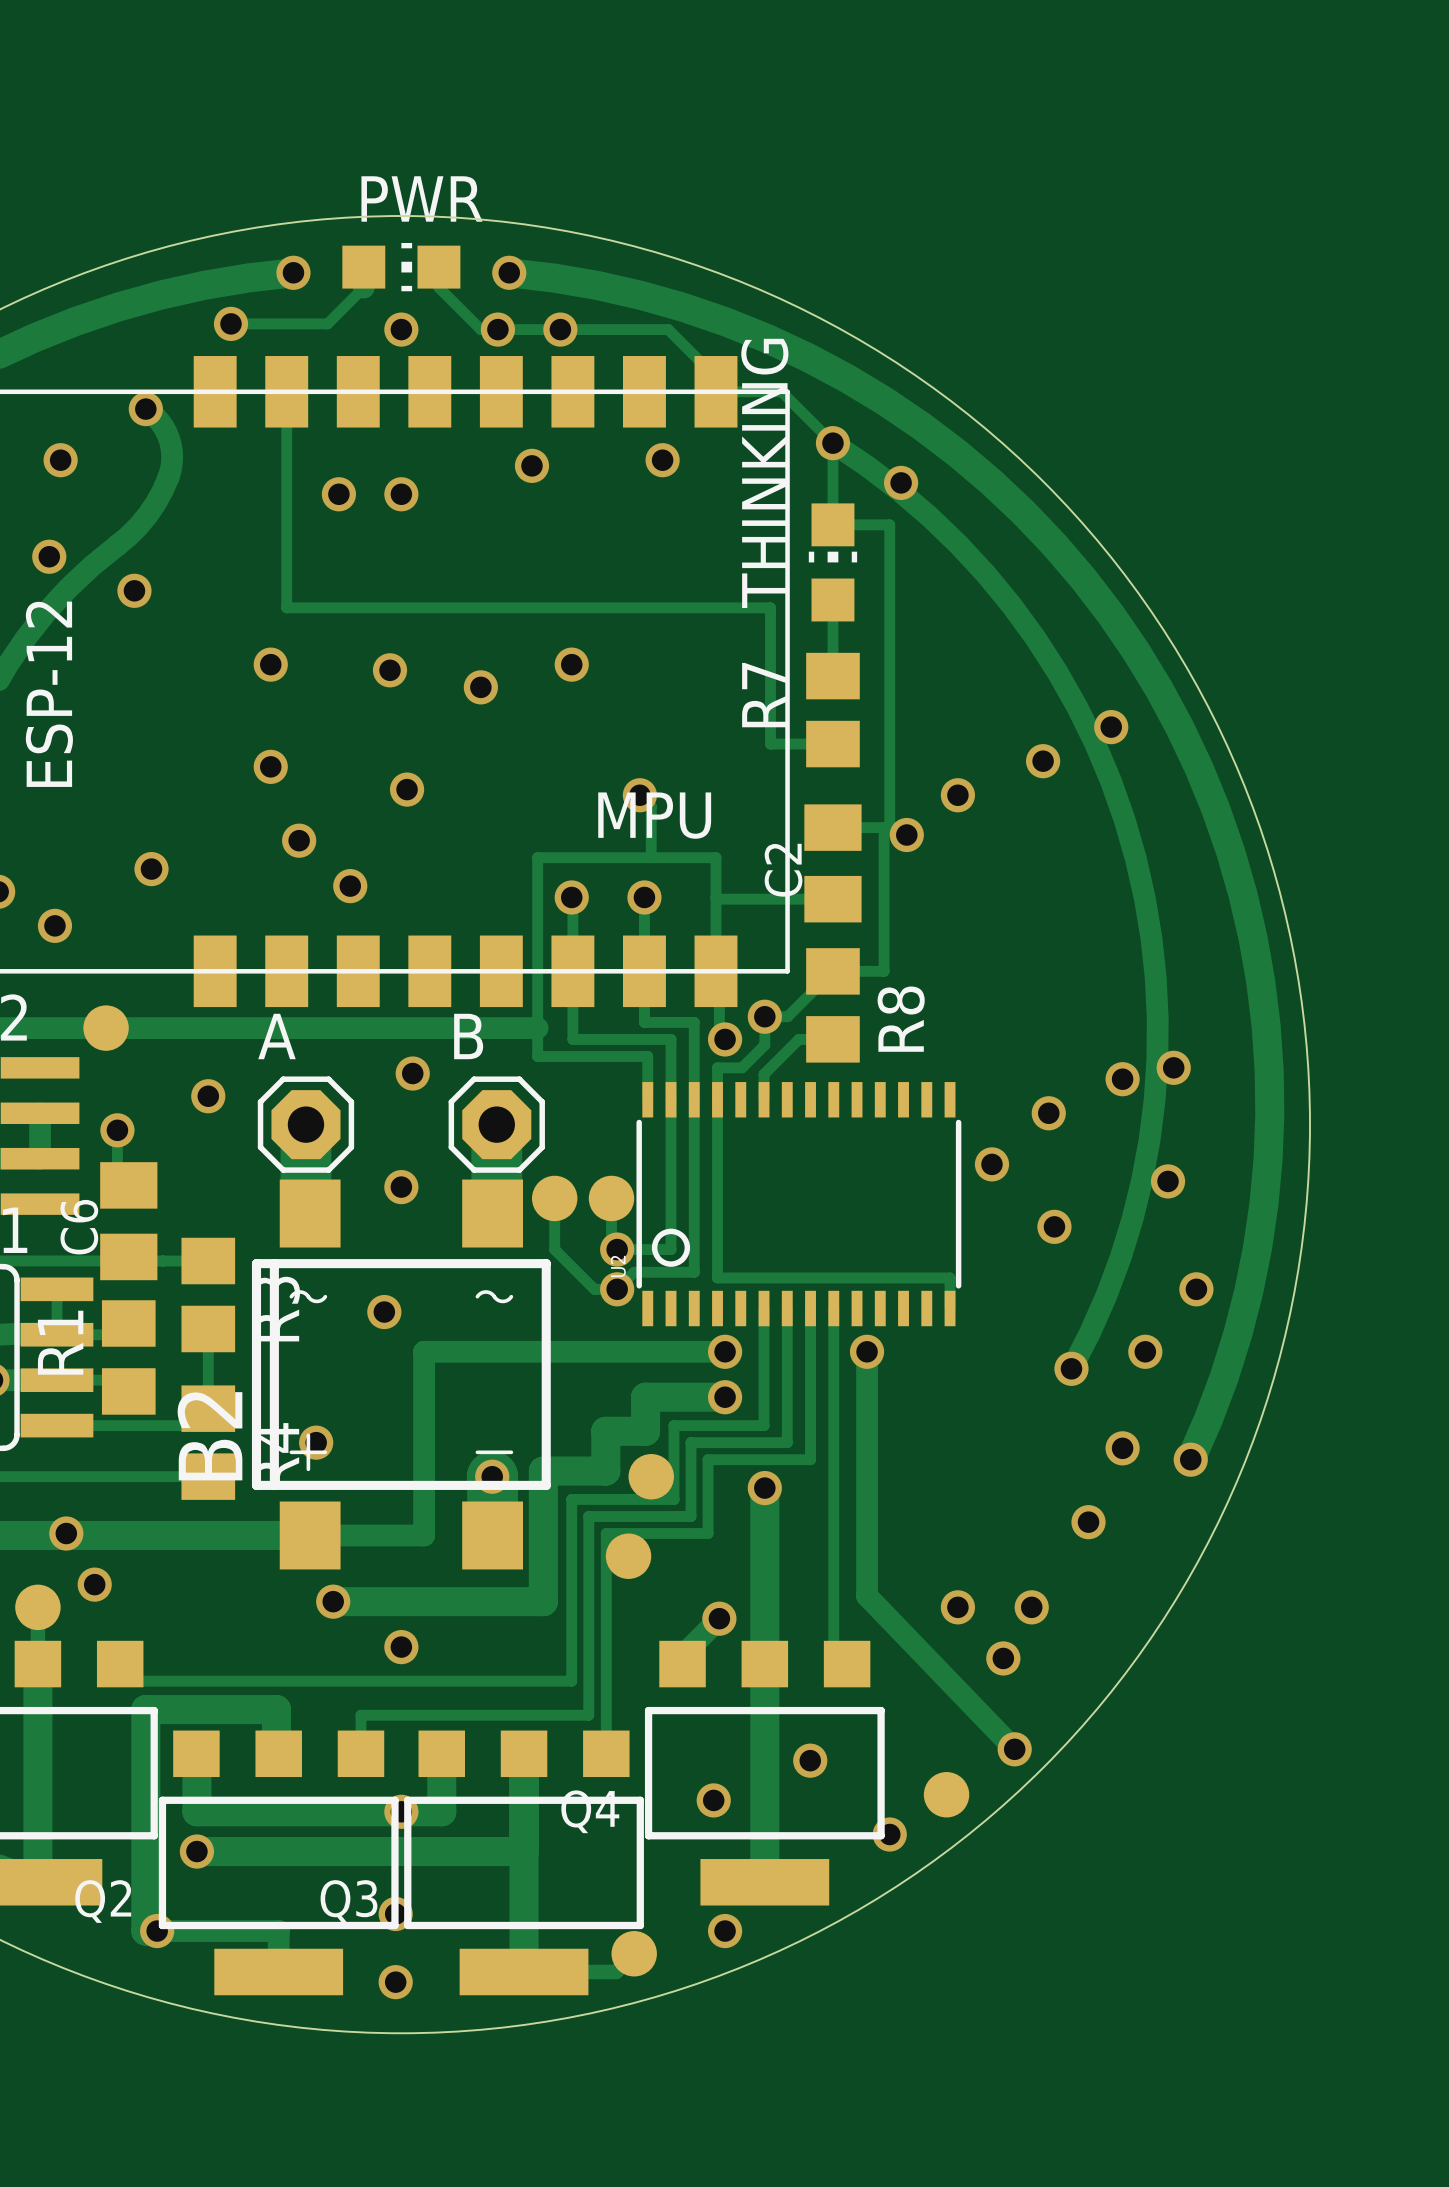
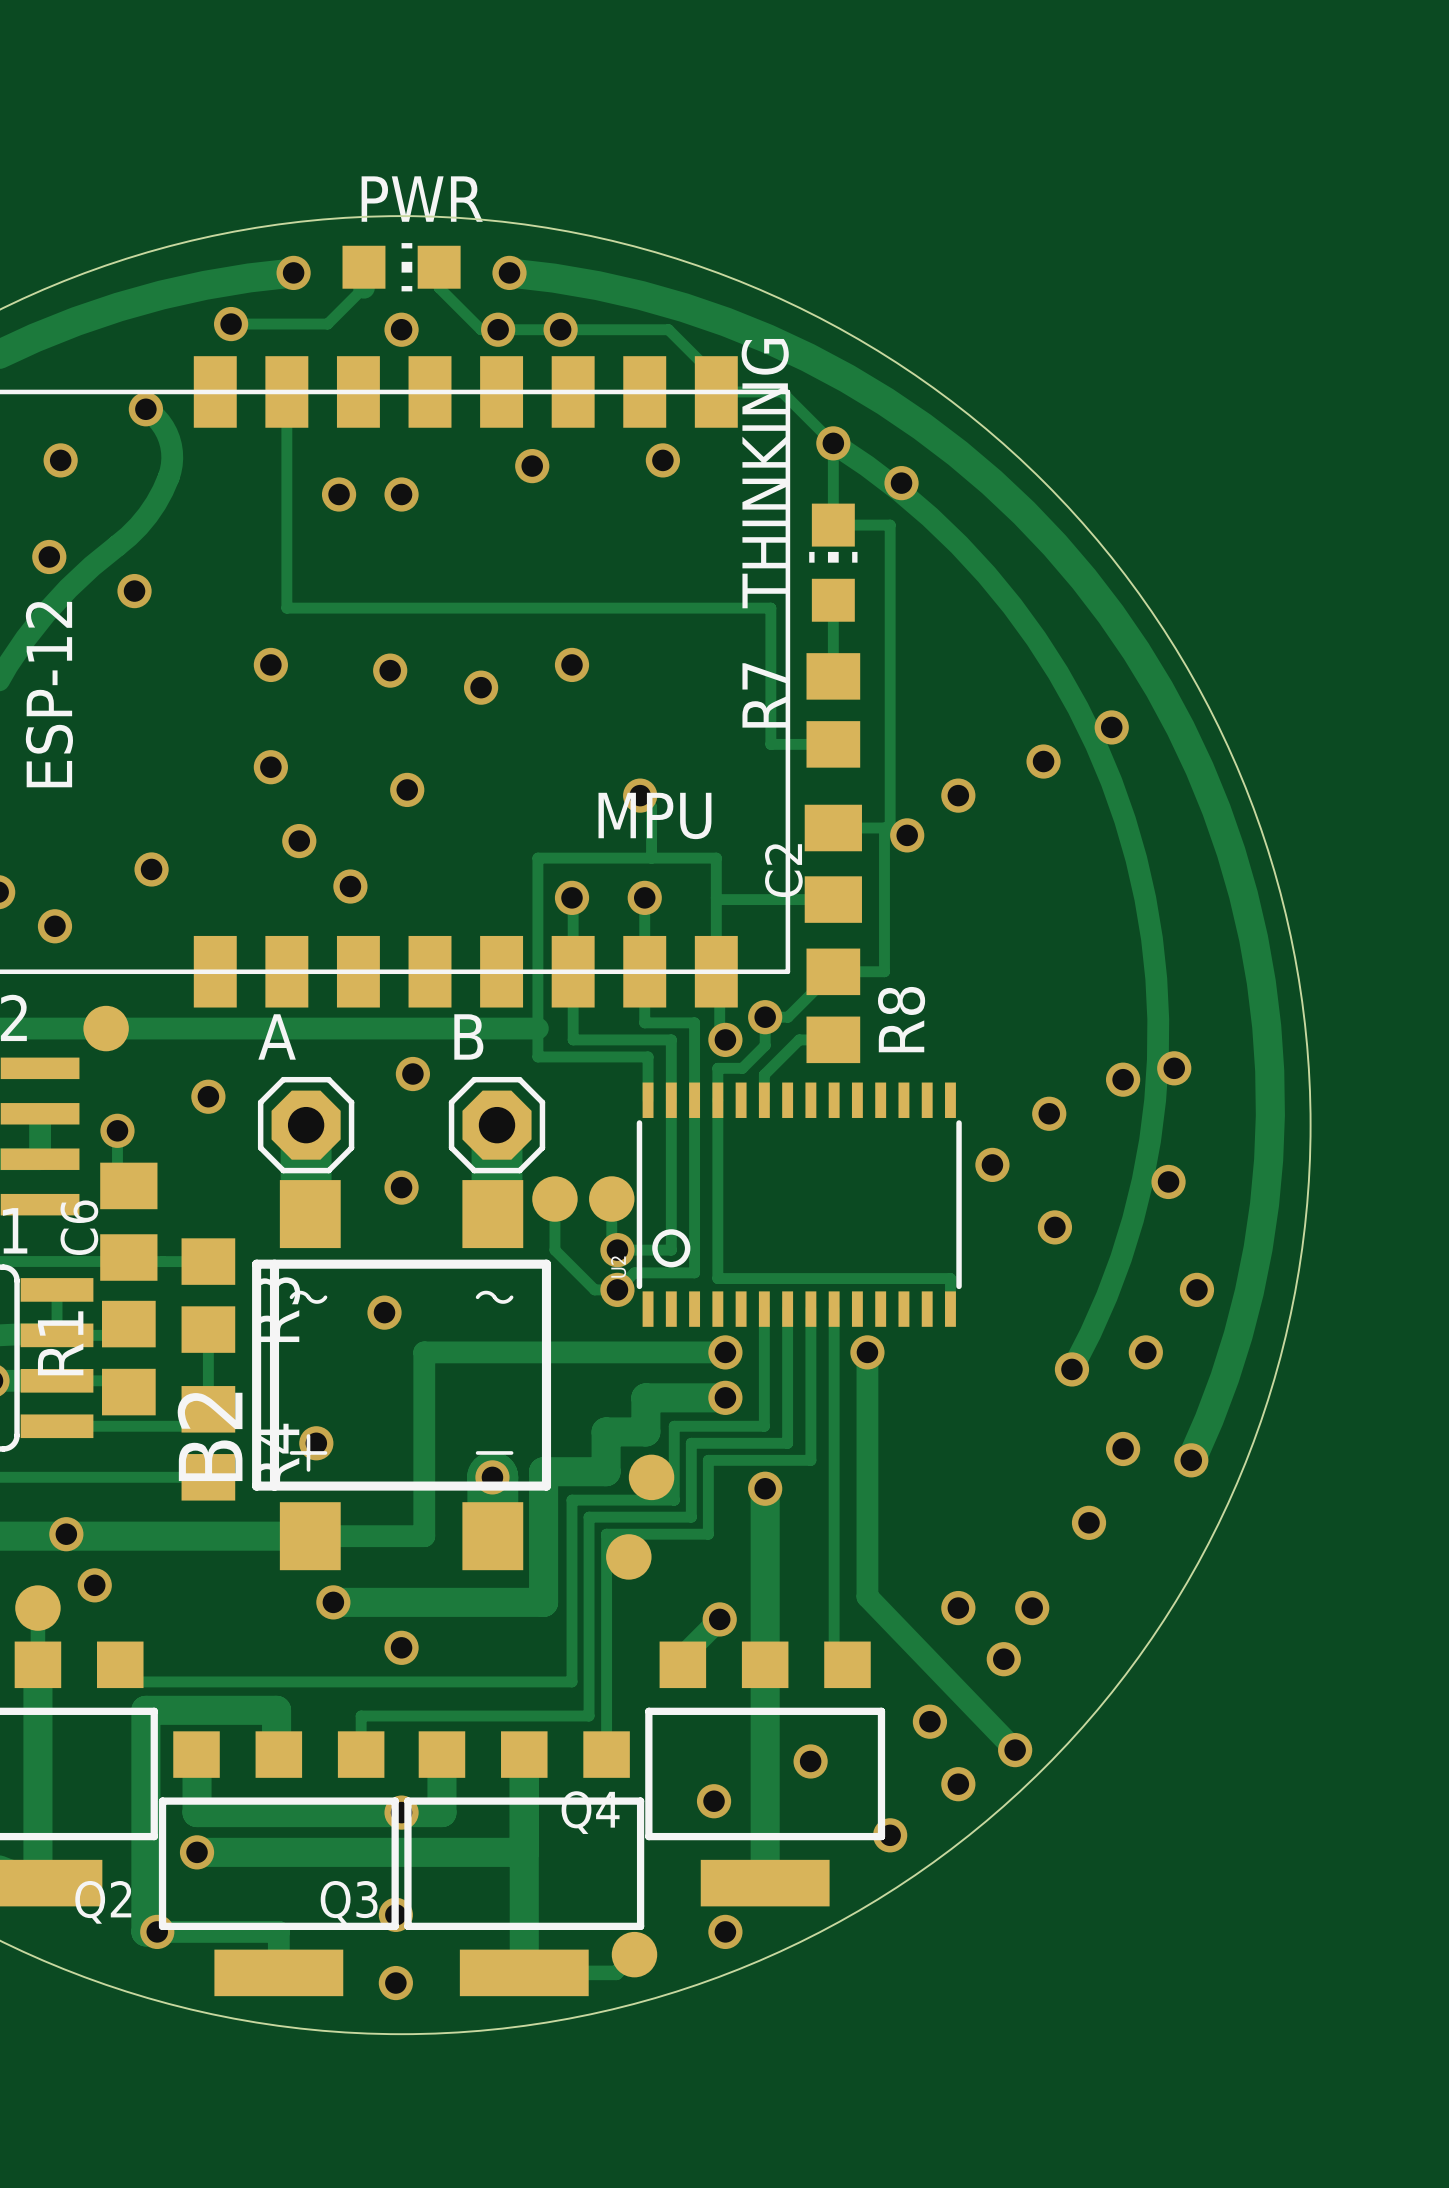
via: none -> (929, 1721)
via: none -> (958, 1784)
part: (946, 1794) -> none

